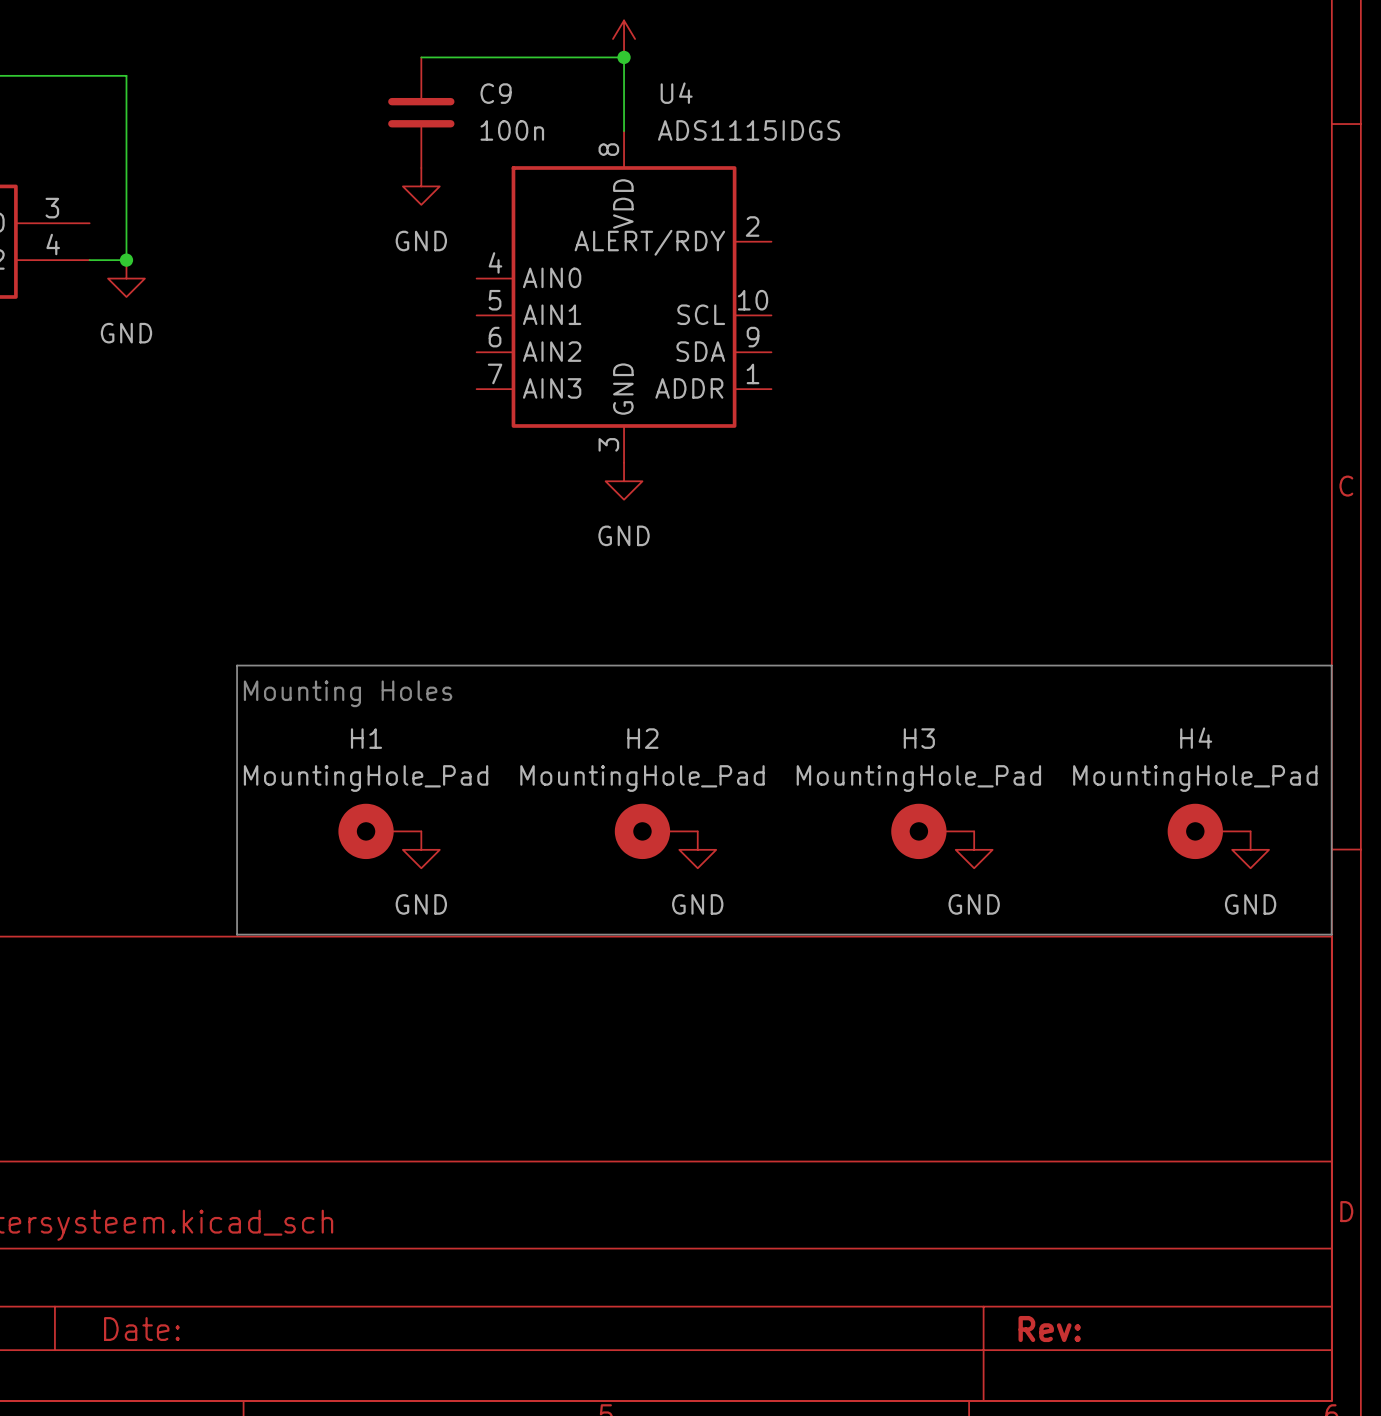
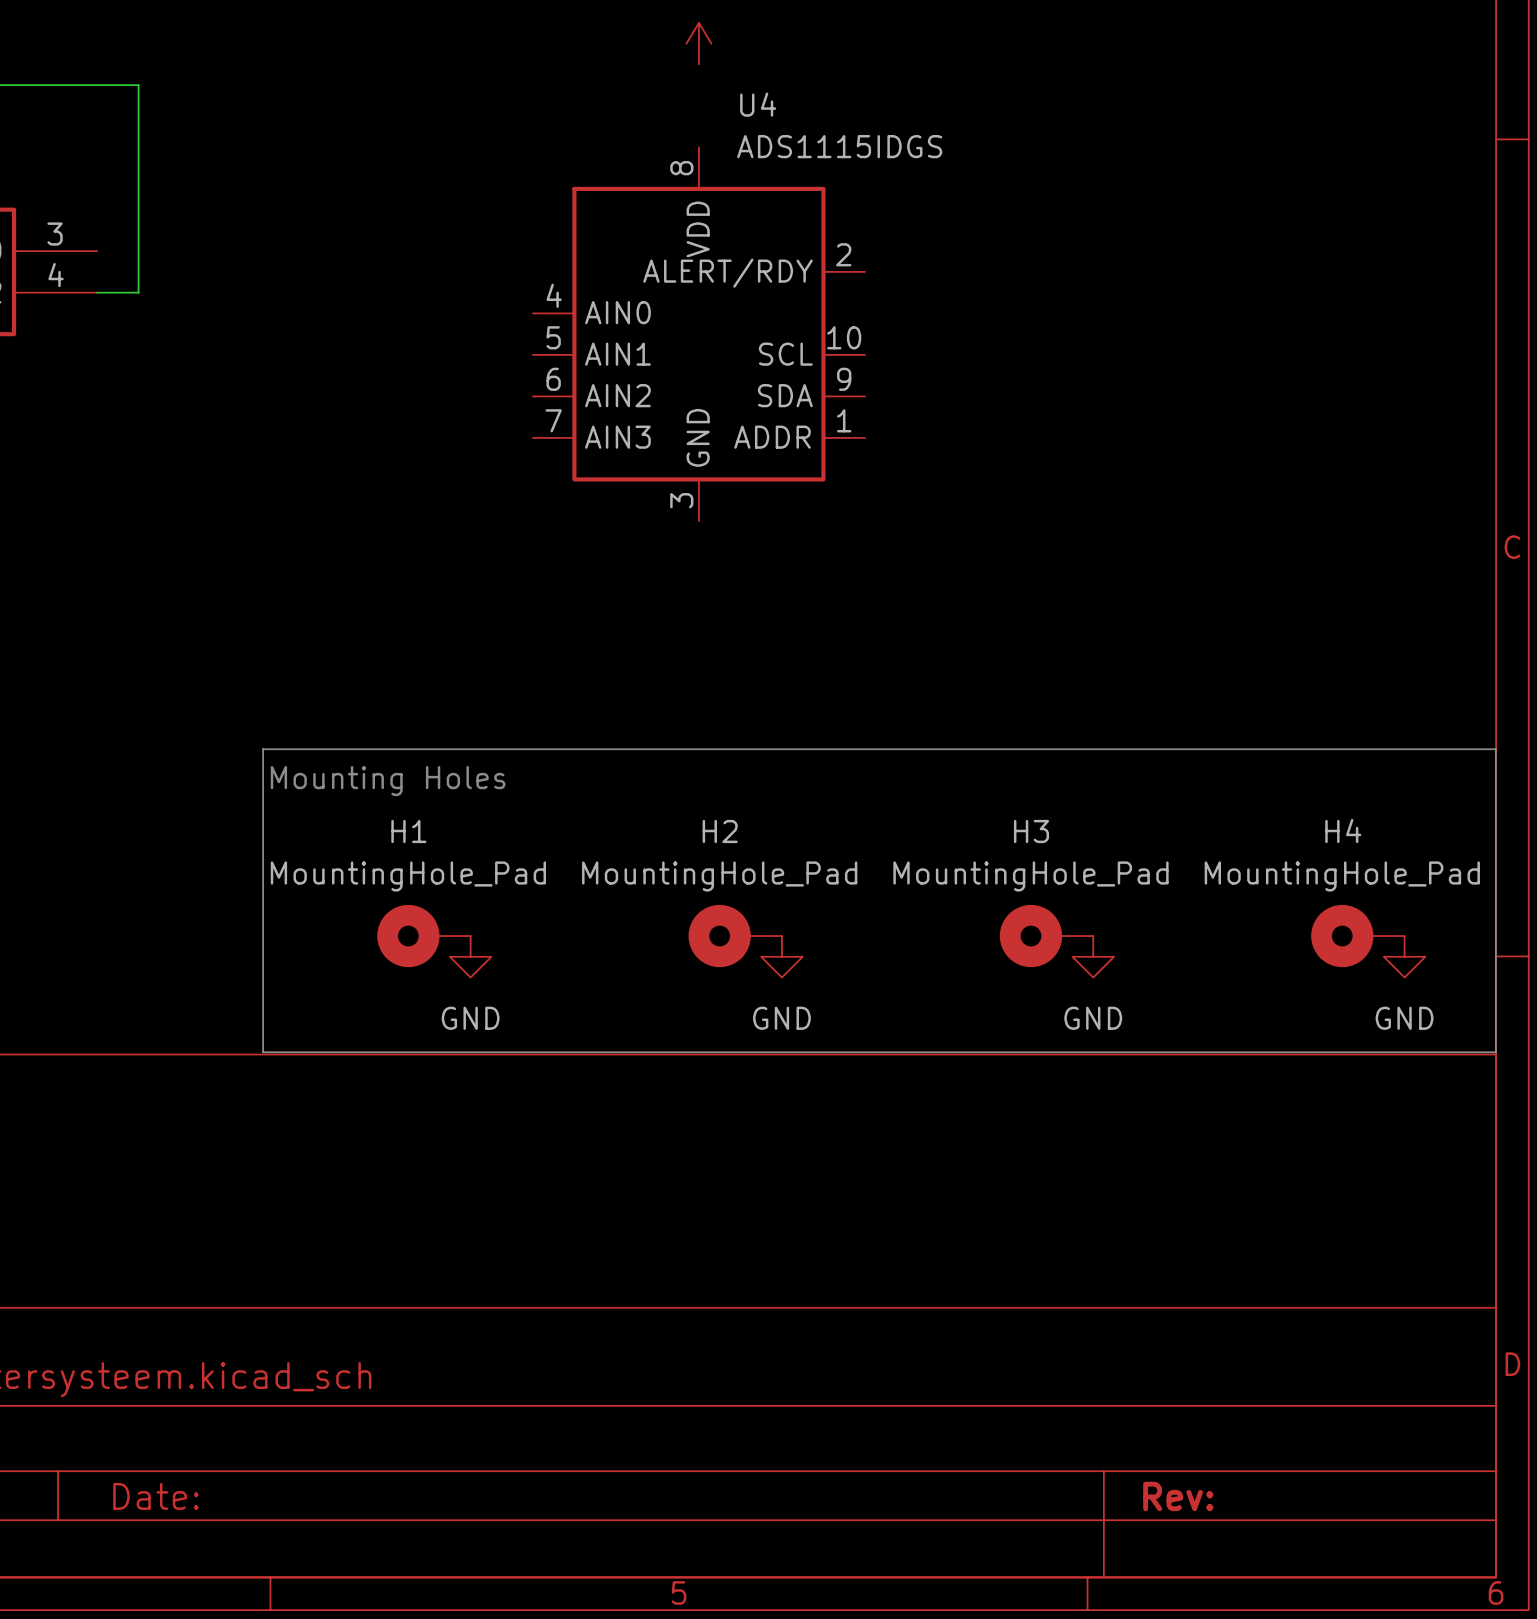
wire: (421, 57) (624, 57) (624, 131) -> none
junction: (624, 57) -> none
C9: 100n (421, 112) -> none
power symbol: GND (421, 186) -> none
junction: (126, 260) -> none
power symbol: GND (126, 278) -> none
power symbol: GND (624, 481) -> none

